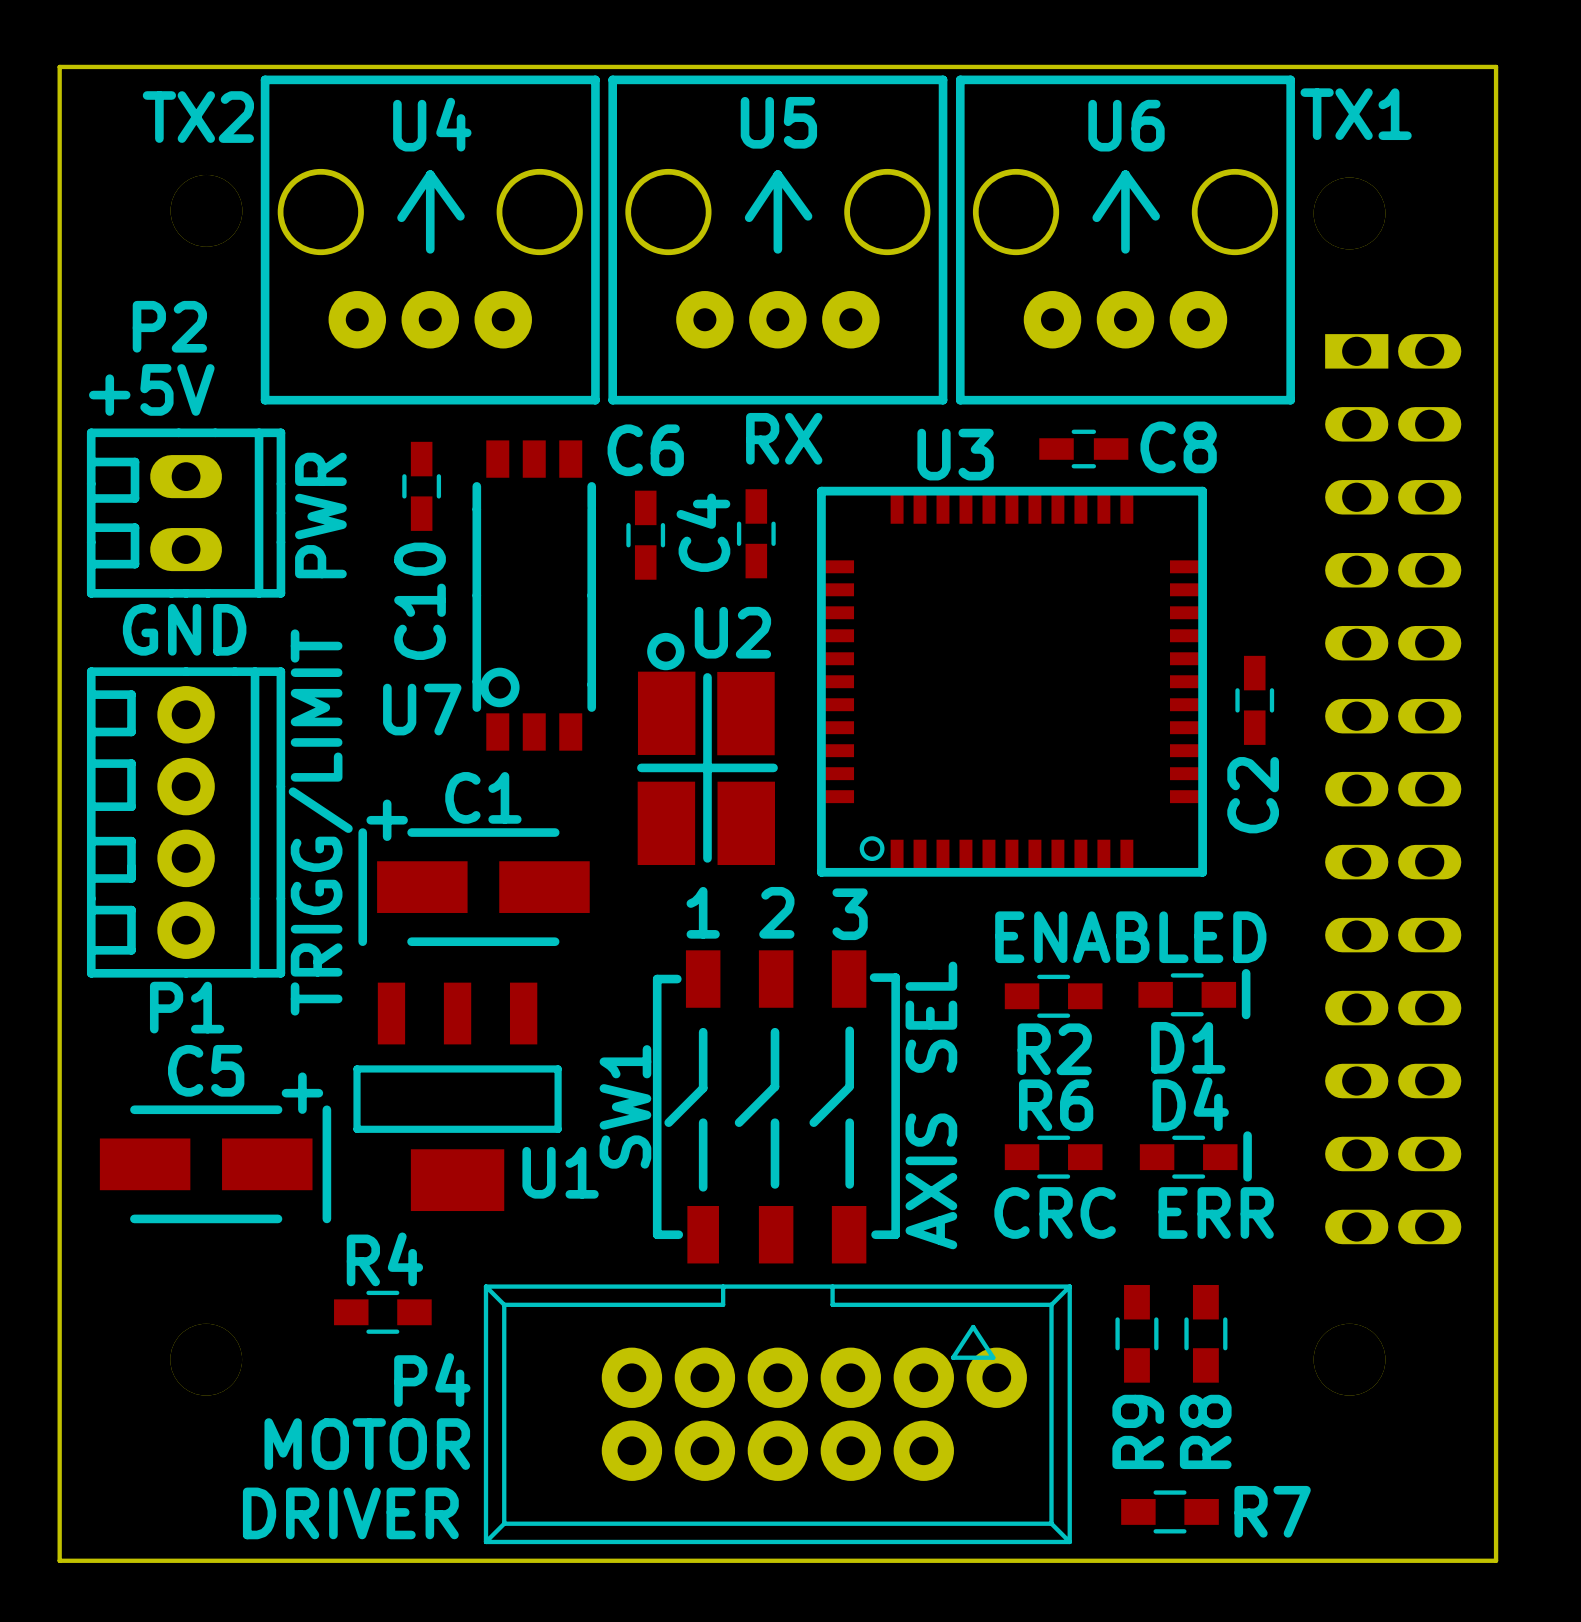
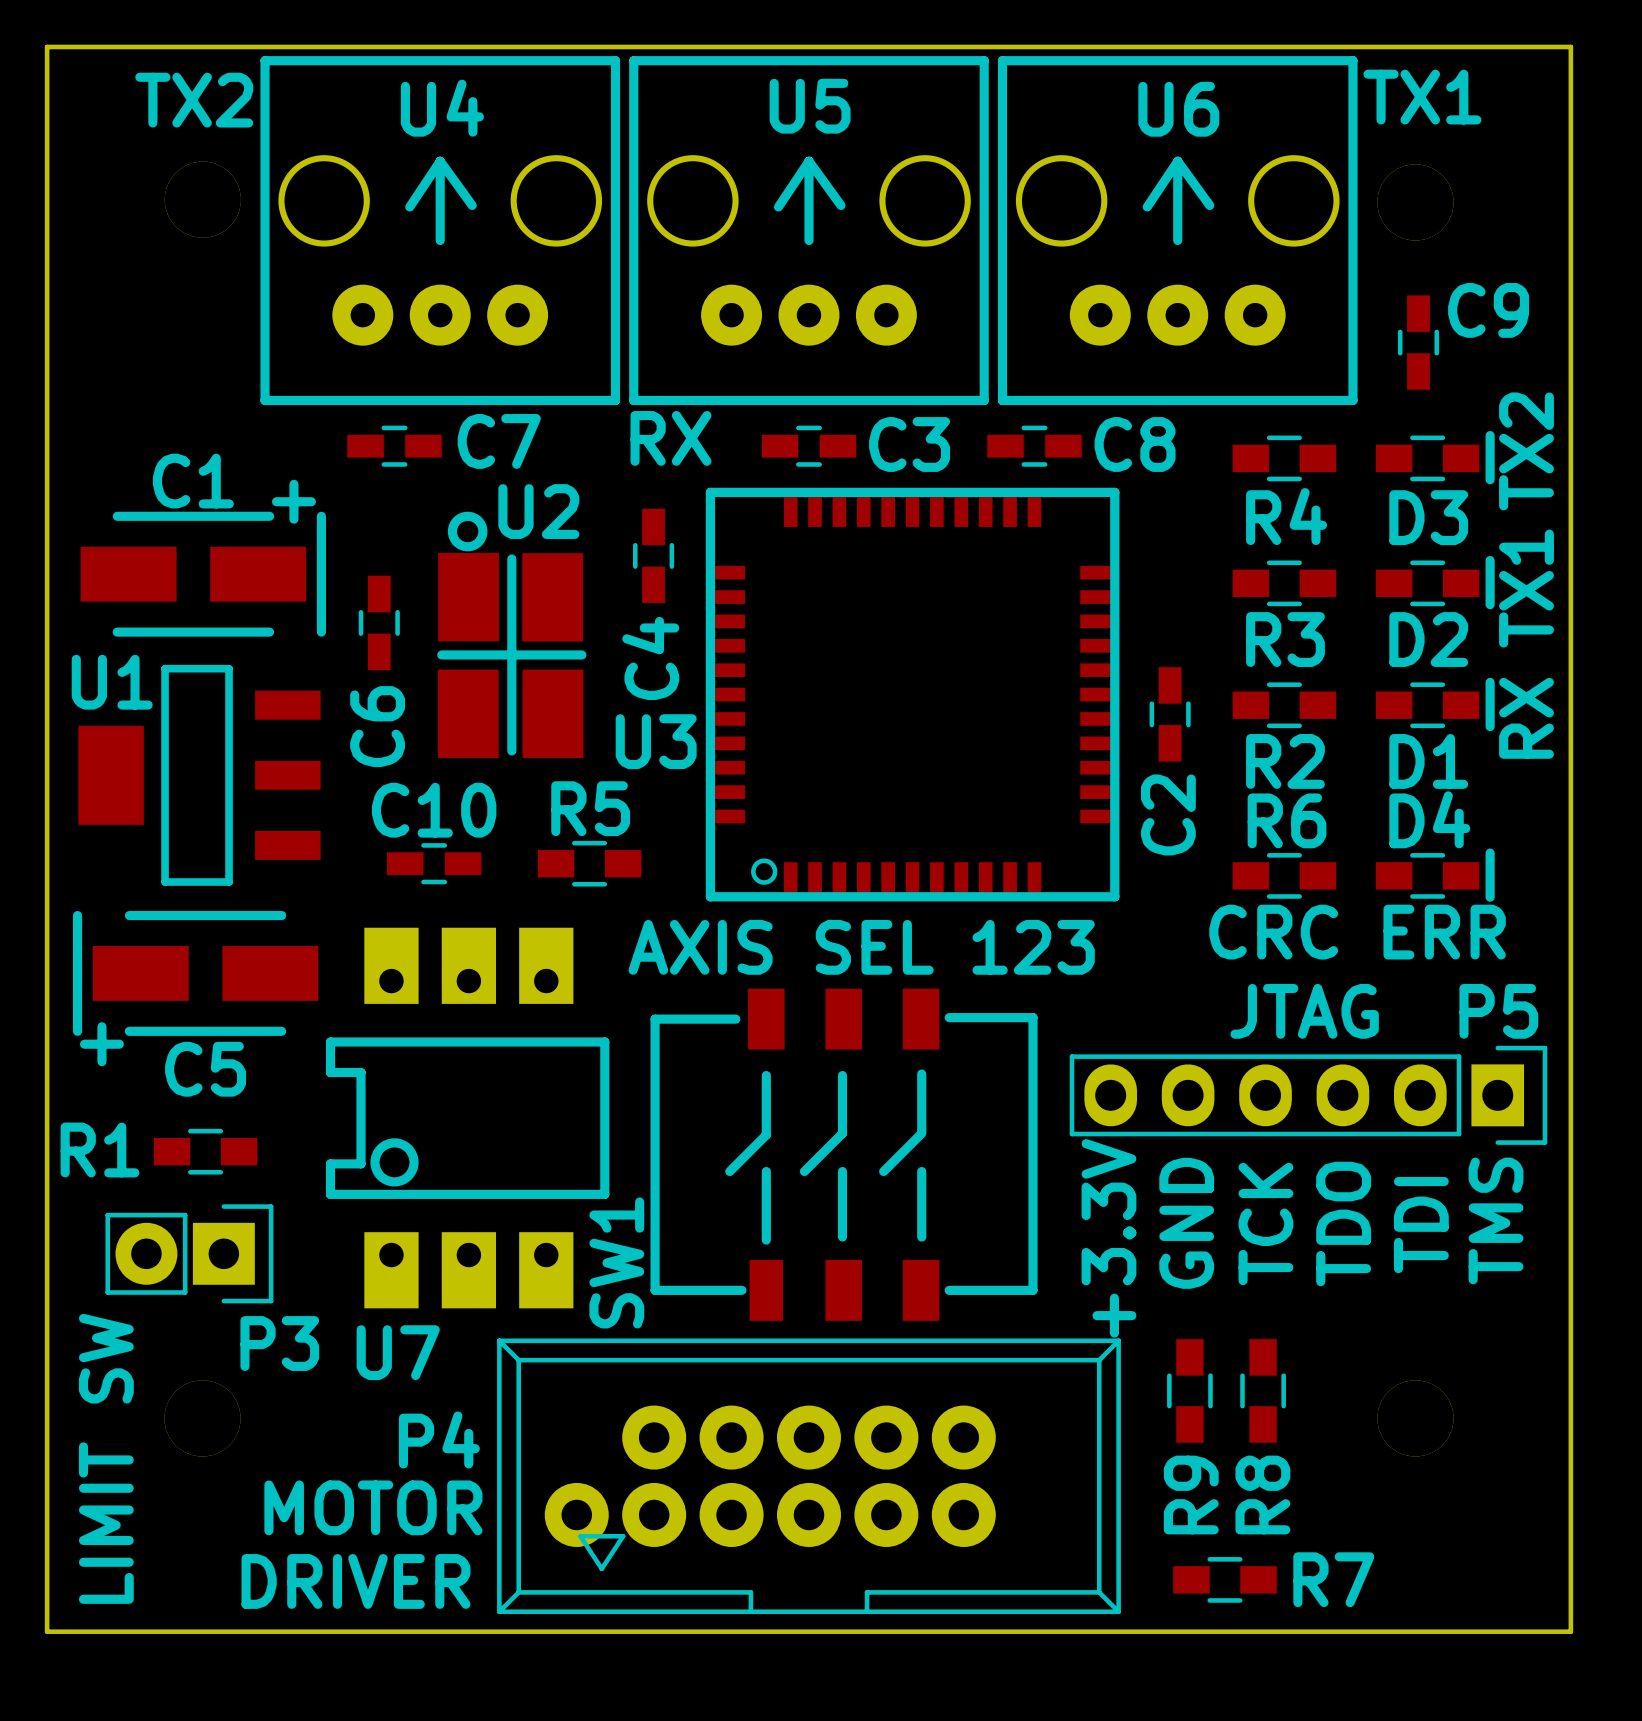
C9: none -> (1418, 342)
text: +5V (151, 389) -> none
text position: RX (784, 438) -> RX (670, 438)
U7 footprint: [472, 440, 597, 751] -> [325, 927, 610, 1309]
C7: none -> (394, 446)
C3: none -> (808, 446)
text: none -> TX2 (1526, 451)
C8 position: (1083, 449) -> (1034, 446)
C6 name rotation: 0° (645, 450) -> 90° counterclockwise (377, 726)
C6 name position: C6 (645, 450) -> C6 (377, 726)
U3 name position: U3 (955, 454) -> U3 (656, 741)
D3: none -> (1435, 457)
C10 rotation: 0° (421, 486) -> 90° clockwise (434, 863)
C10 position: (421, 486) -> (434, 863)
P2: (186, 513) -> none
text: PWR (320, 515) -> none
C4 name position: C4 (703, 532) -> C4 (650, 658)
C4 position: (756, 533) -> (653, 555)
C6 position: (645, 535) -> (379, 622)
D2: none -> (1435, 582)
R3: none -> (1284, 583)
text: none -> TX1 (1526, 588)
C10 name position: C10 (420, 601) -> C10 (434, 810)
text: GND (184, 629) -> none
U3 position: (1012, 681) -> (912, 694)
text: none -> RX (1526, 718)
C2 position: (1254, 700) -> (1170, 714)
U7 name position: U7 (422, 709) -> U7 (398, 1352)
U2 position: (707, 748) -> (511, 634)
part: (1393, 789) -> none
P1: (186, 822) -> none
text: TRIGG/LIMIT (320, 822) -> none
C1 footprint: [358, 828, 590, 947] -> [80, 511, 326, 637]
R5: none -> (589, 863)
text: 1 (703, 912) -> none
text: 2 (776, 912) -> none
text: 3 (850, 914) -> AXIS SEL 123 (861, 947)
text: ENABLED (1130, 937) -> none
SW1 footprint: [652, 950, 900, 1264] -> [650, 988, 1038, 1321]
D1 position: (1194, 994) -> (1435, 704)
R2 position: (1053, 996) -> (1284, 705)
P5: none -> JTAG (1308, 1095)
C5 name position: C5 (206, 1070) -> C5 (205, 1069)
U1 rotation: 0° (457, 1096) -> 90° clockwise (199, 775)
U1 position: (457, 1096) -> (199, 775)
C5 footprint: [99, 1105, 332, 1224] -> [72, 910, 319, 1036]
text: AXIS SEL (931, 1105) -> none
SW1 name position: SW1 (625, 1106) -> SW1 (616, 1262)
R1: none -> (205, 1151)
D4 position: (1195, 1156) -> (1435, 875)
R6 position: (1053, 1157) -> (1284, 875)
U1 name position: U1 (560, 1172) -> U1 (112, 682)
P3: none -> (189, 1253)
text position: CRC ERR (1134, 1213) -> CRC ERR (1357, 932)
R4 name position: R4 (384, 1259) -> R4 (1286, 516)
R4 position: (382, 1312) -> (1284, 458)
text: none -> LIMIT SW (106, 1458)
P4 rotation: 0° (777, 1414) -> 180° (808, 1476)

